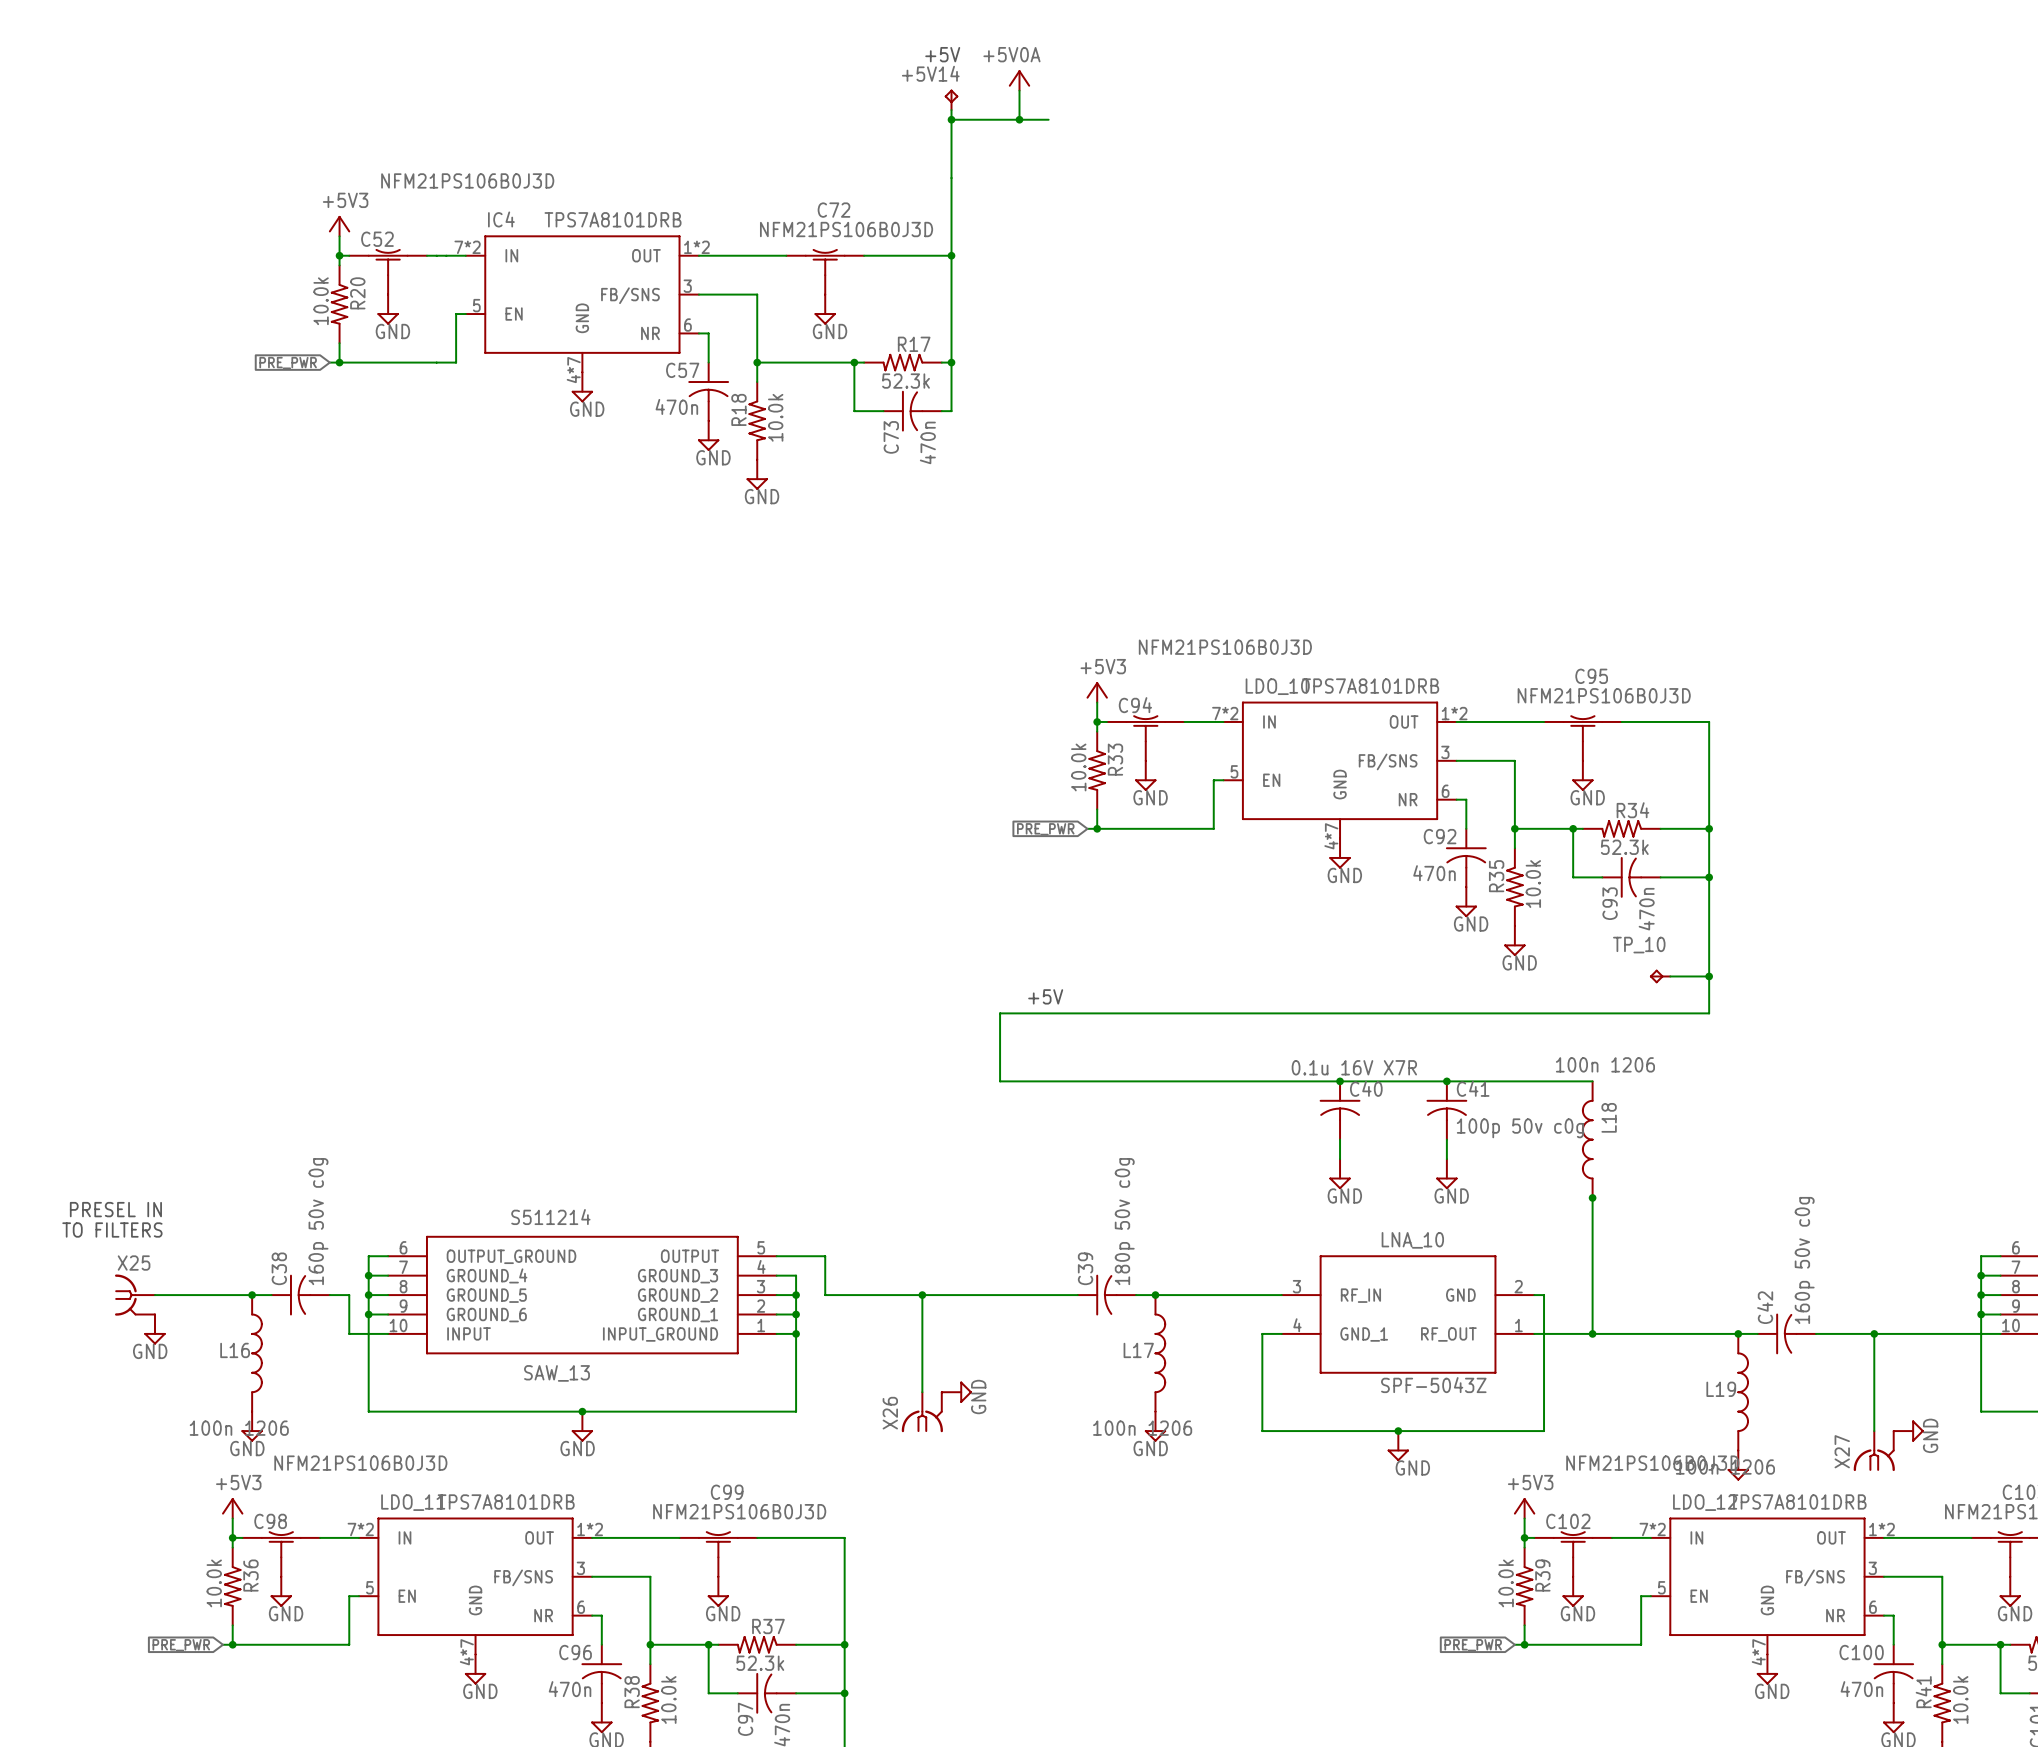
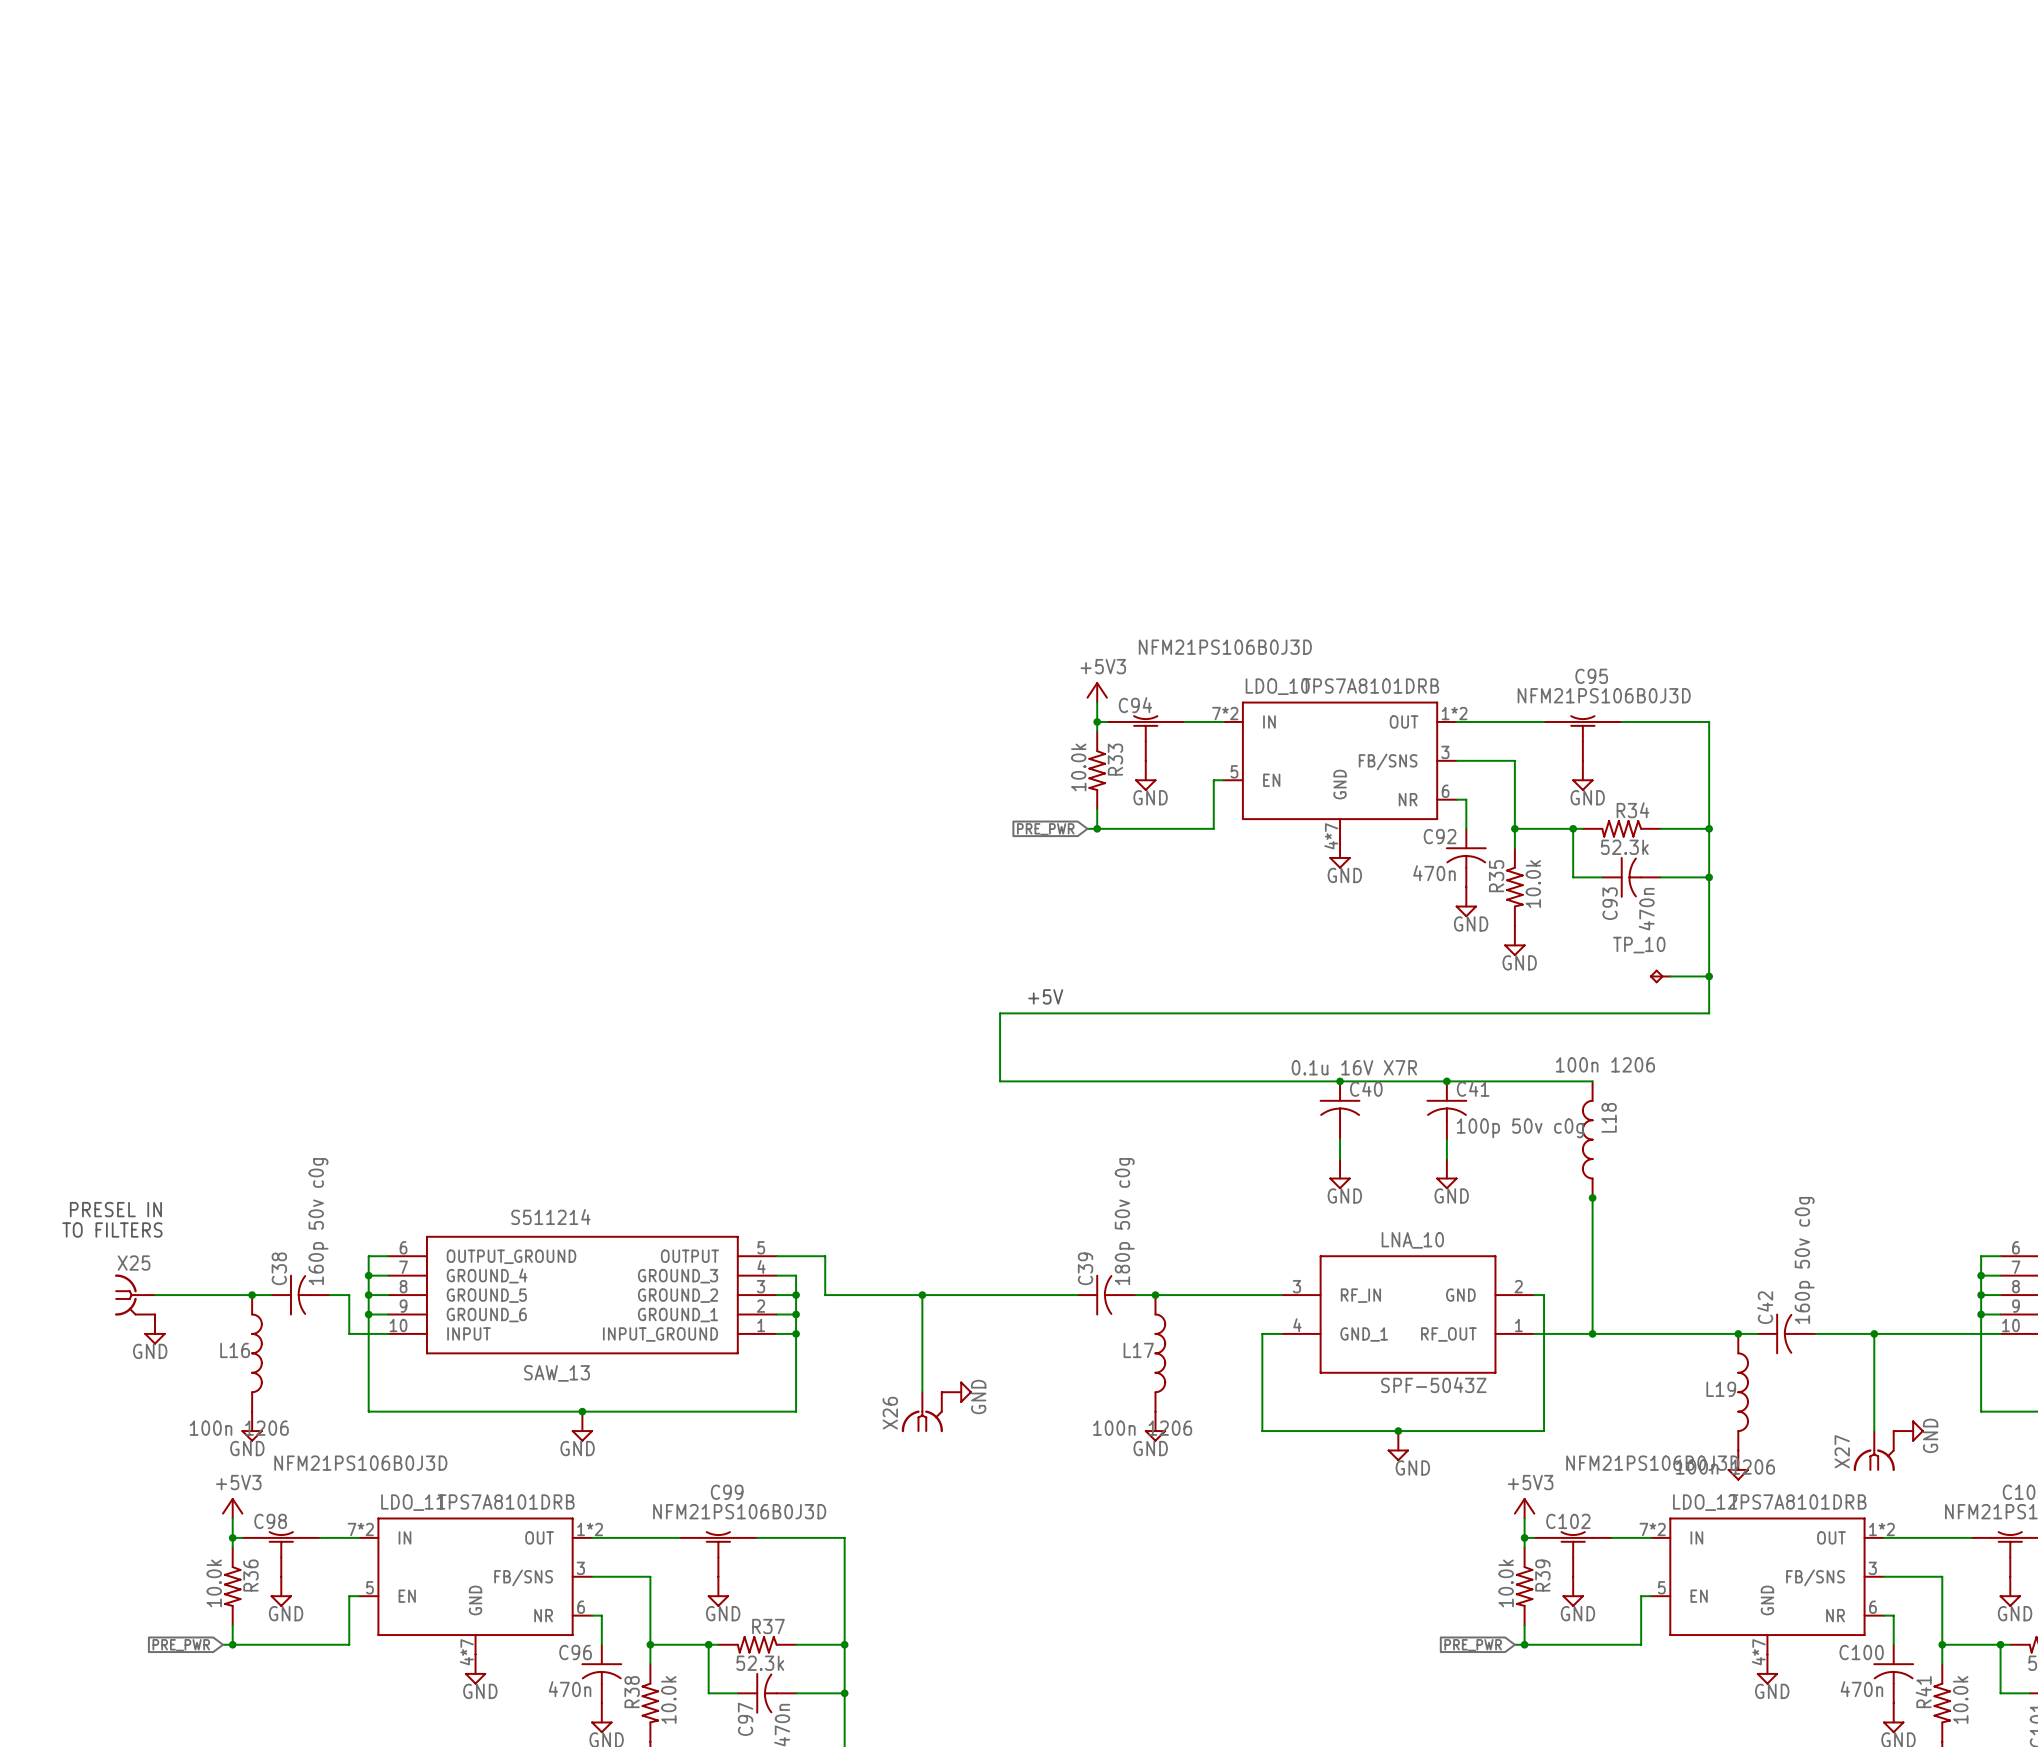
text: +5V (942, 54) -> none
power symbol: +5V0A (1019, 80) -> none
wire: (1019, 90) (1019, 119) -> none
+5V14: (951, 99) -> none
wire: (951, 110) (951, 411) (941, 411) -> none
wire: (951, 119) (1048, 119) -> none
junction: (951, 119) -> none
junction: (1019, 119) -> none
power symbol: +5V3 (339, 226) -> none
wire: (339, 236) (339, 265) -> none
wire: (339, 255) (349, 255) -> none
junction: (339, 255) -> none
wire: (426, 255) (465, 255) -> none
wire: (698, 255) (786, 255) -> none
wire: (864, 255) (951, 255) -> none
junction: (951, 255) -> none
C52: NFM21PS106B0J3D (388, 271) -> none
C72: NFM21PS106B0J3D (825, 271) -> none
wire: (698, 294) (757, 294) (757, 382) -> none
IC4: TPS7A8101DRB (582, 303) -> none
R20: 10.0k (339, 304) -> none
power symbol: GND (388, 309) -> none
power symbol: GND (825, 309) -> none
wire: (465, 314) (456, 314) (456, 362) (329, 362) -> none
wire: (698, 333) (708, 333) (708, 362) -> none
wire: (339, 343) (339, 362) -> none
junction: (339, 362) -> none
wire: (757, 362) (864, 362) -> none
junction: (757, 362) -> none
wire: (854, 362) (854, 411) (883, 411) -> none
junction: (854, 362) -> none
R17: 52.3k (902, 362) -> none
wire: (941, 362) (951, 362) -> none
junction: (951, 362) -> none
global label: PRE_PWR (288, 363) -> none
power symbol: GND (582, 387) -> none
C57: 470n (708, 391) -> none
C73: 470n (912, 411) -> none
R18: 10.0k (757, 420) -> none
power symbol: GND (708, 435) -> none
power symbol: GND (757, 474) -> none

